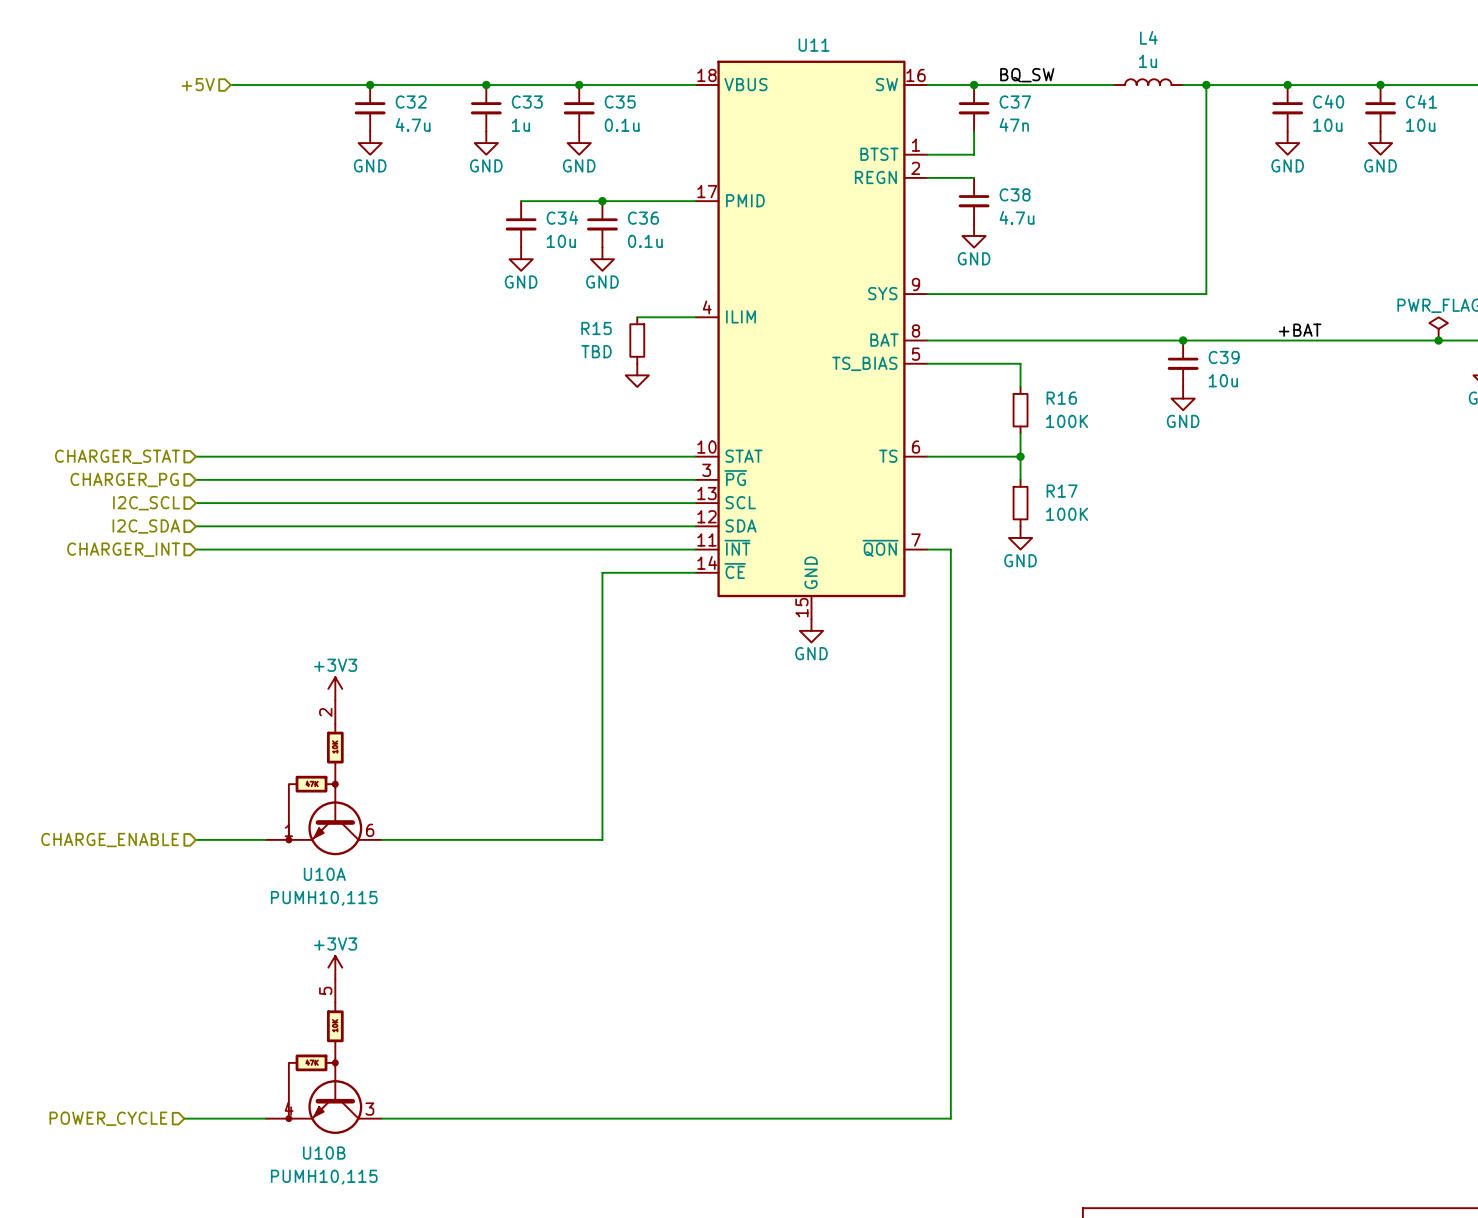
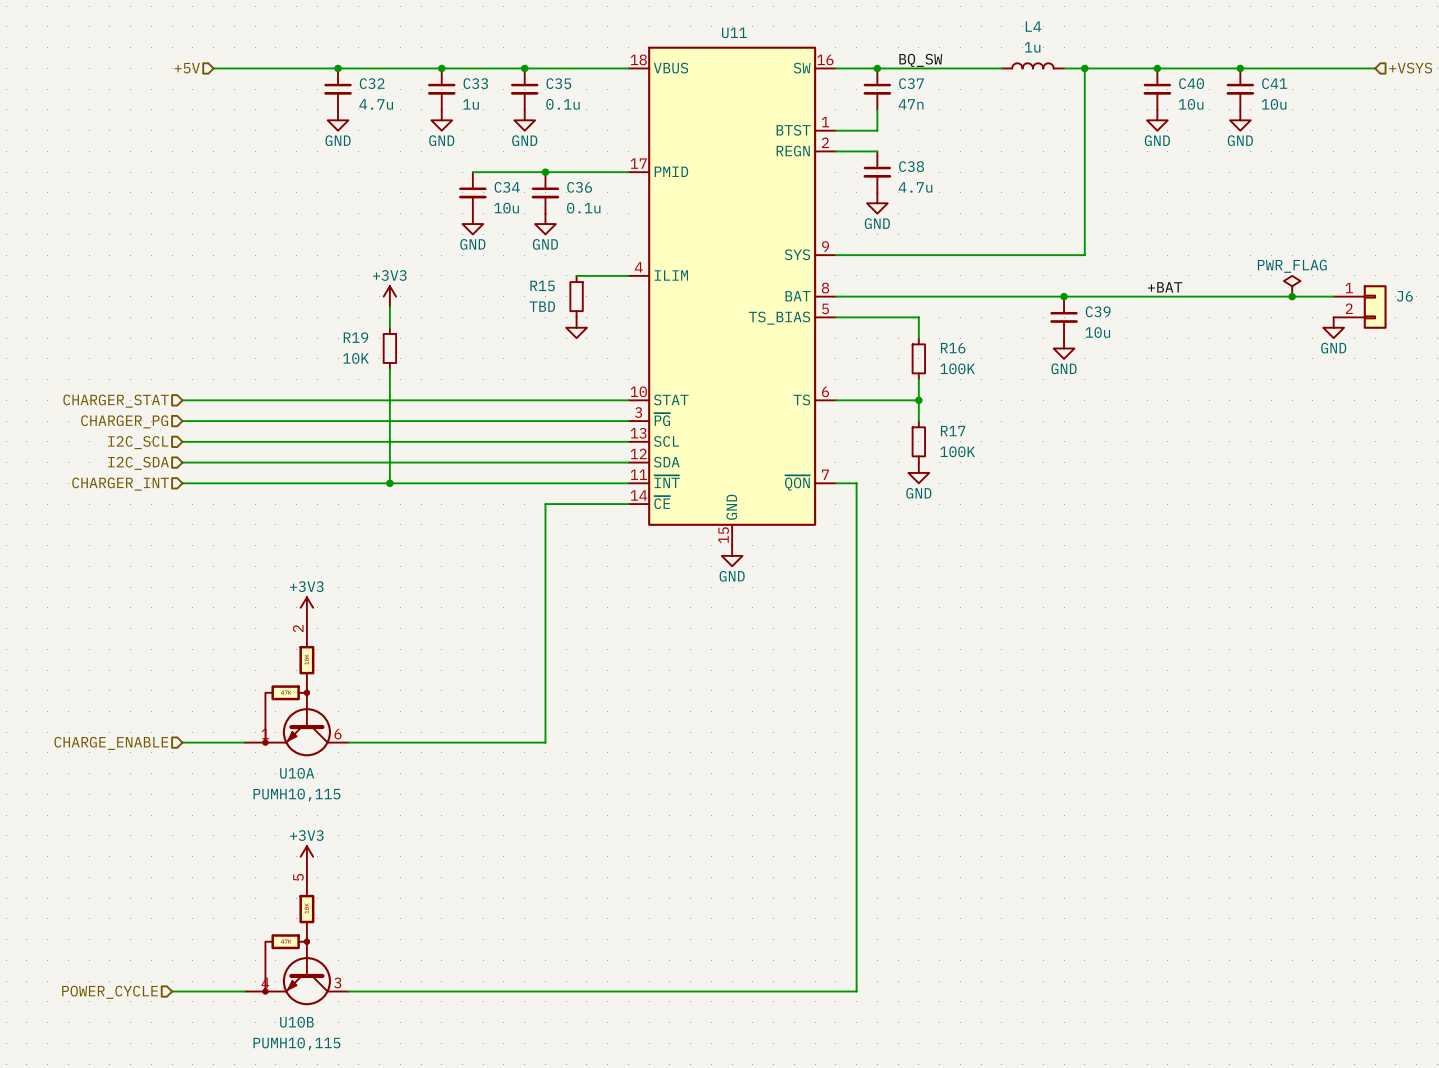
power symbol: none -> +3V3 (389, 296)
wire: none -> (389, 307) (389, 327)
R19: none -> 10K (389, 348)
wire: none -> (389, 369) (389, 483)
junction: none -> (389, 483)

